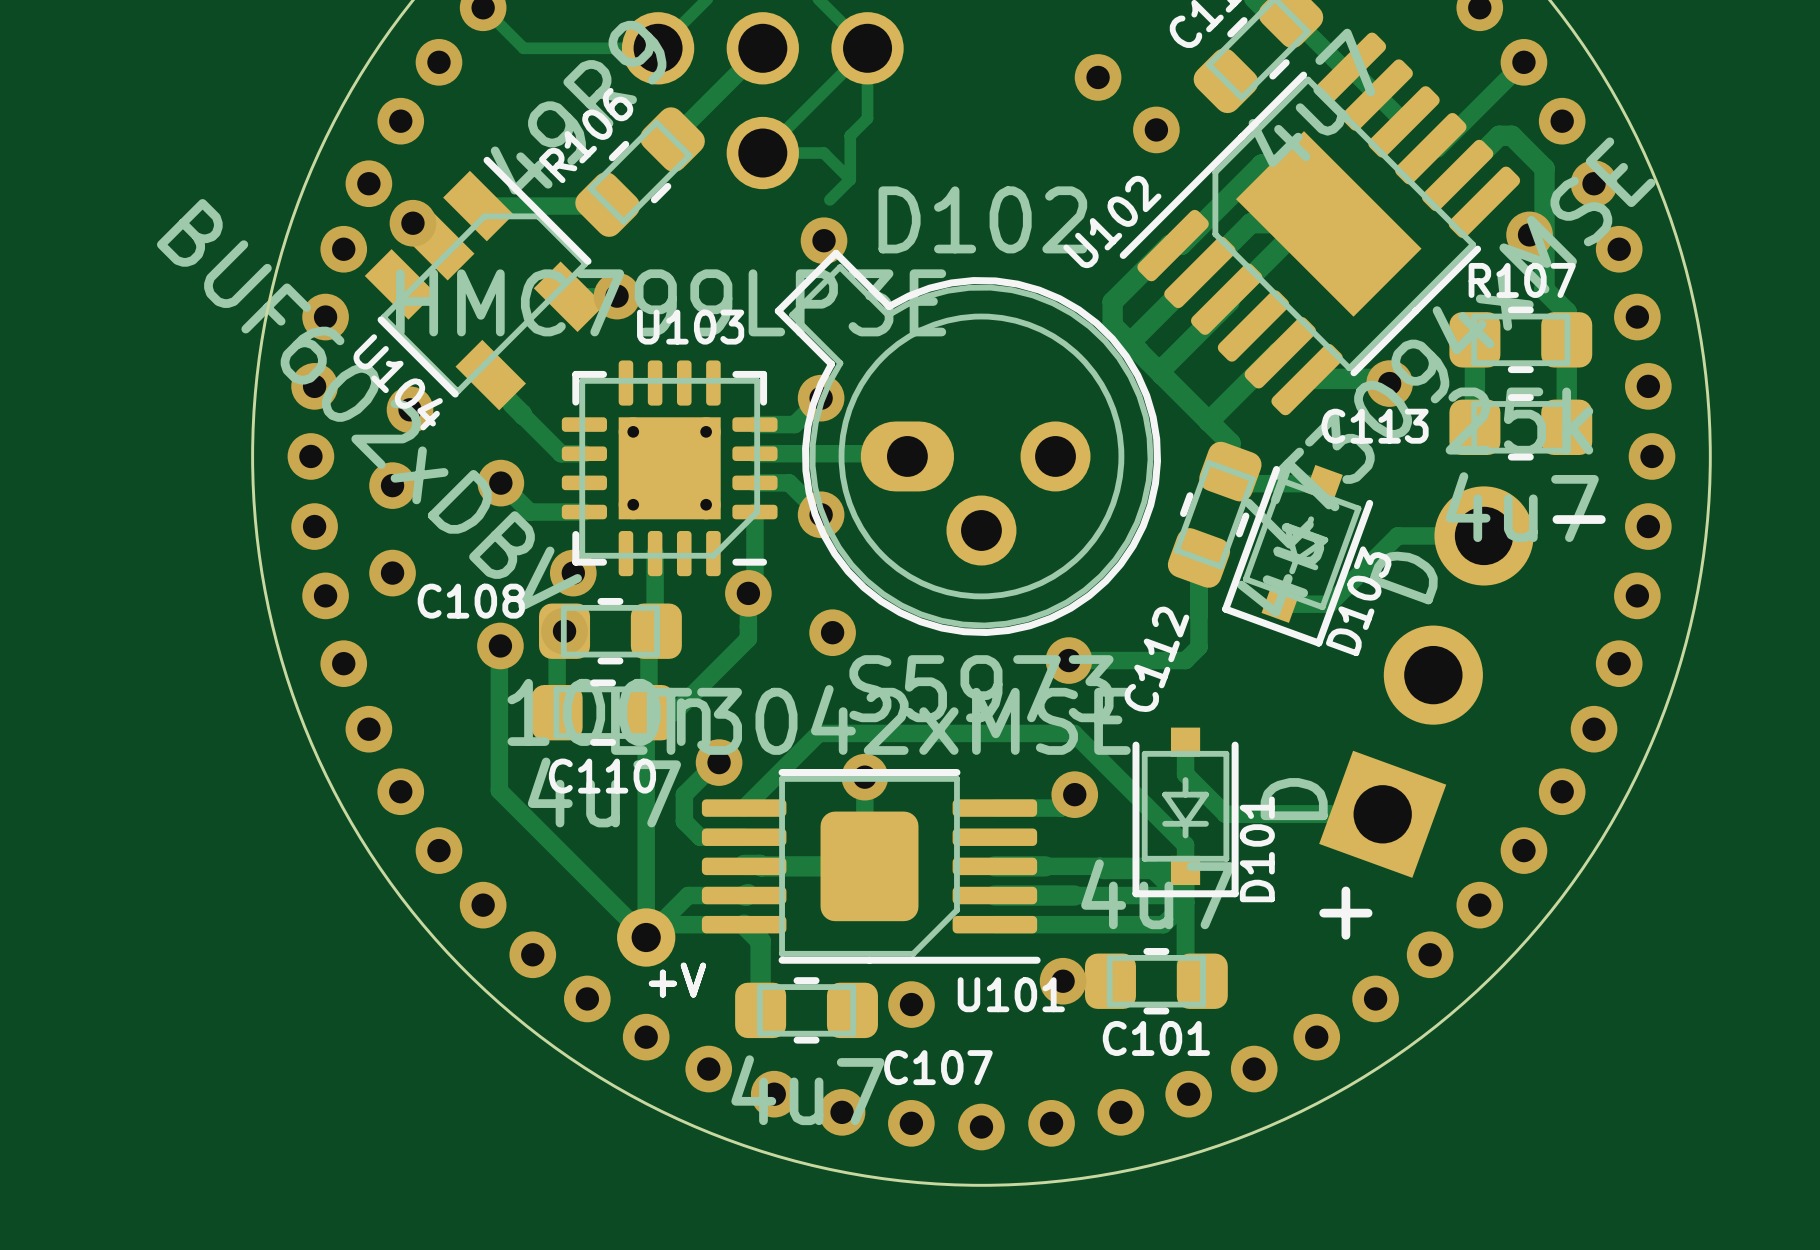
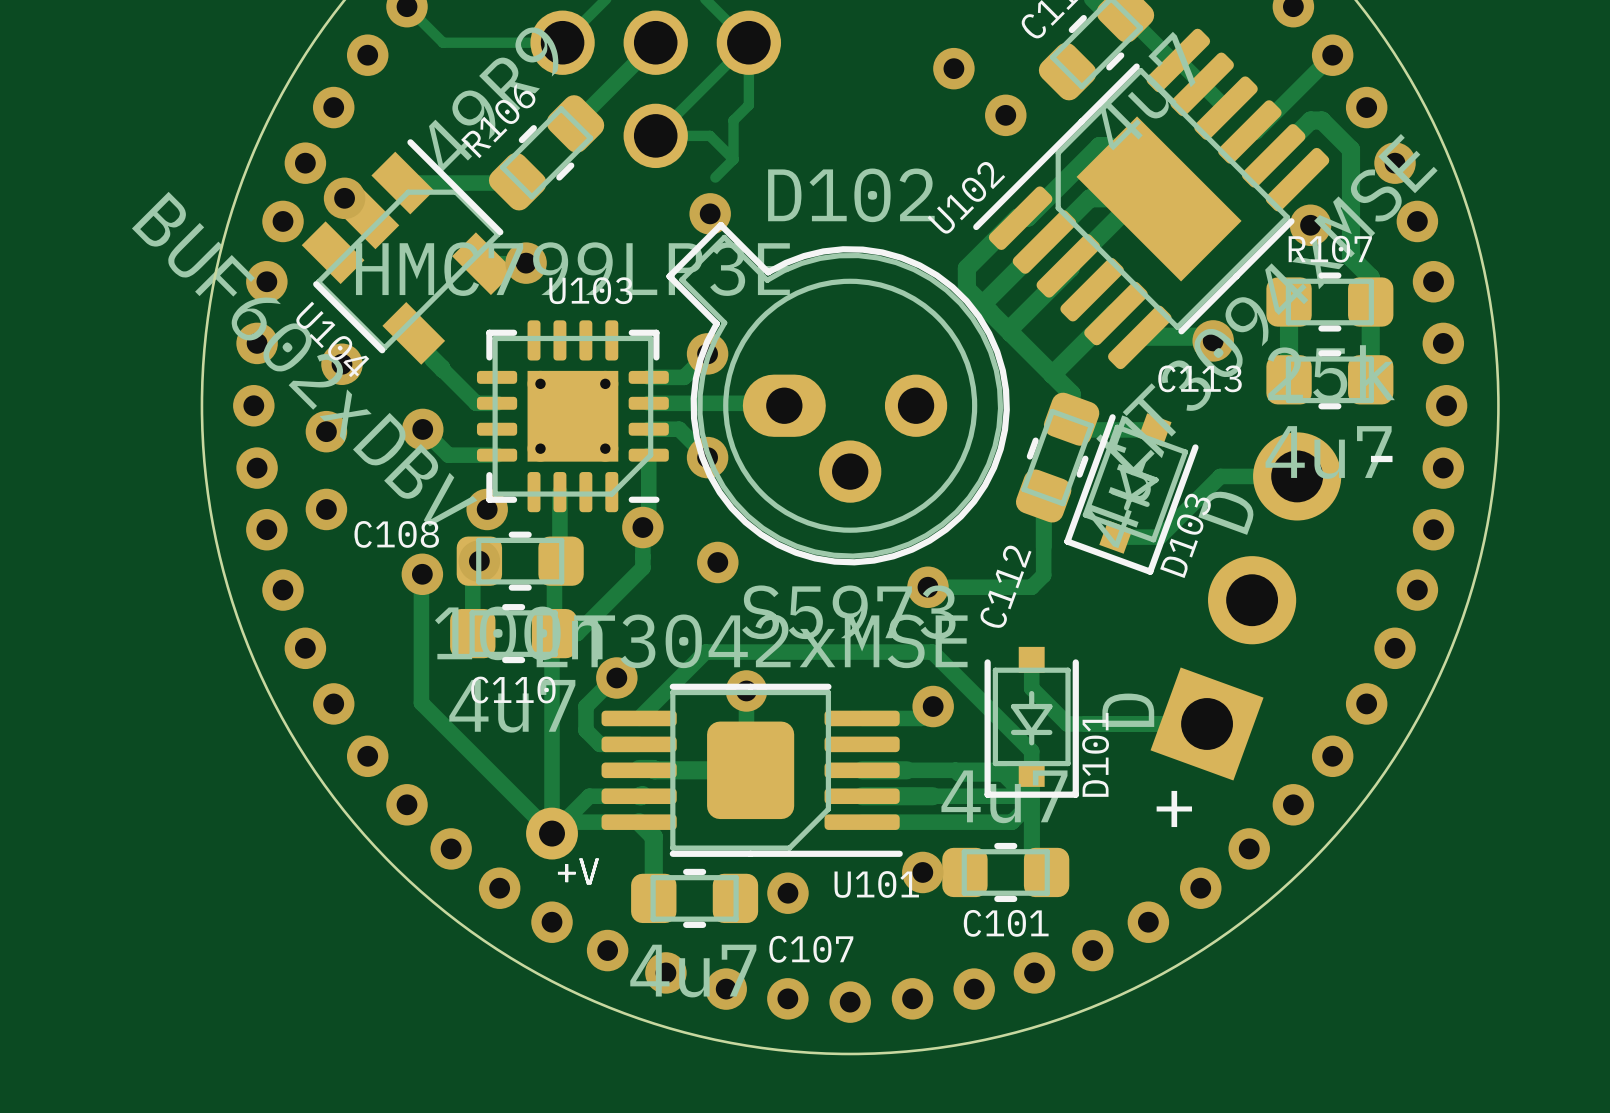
via position: (1529, 234) -> (1310, 225)

